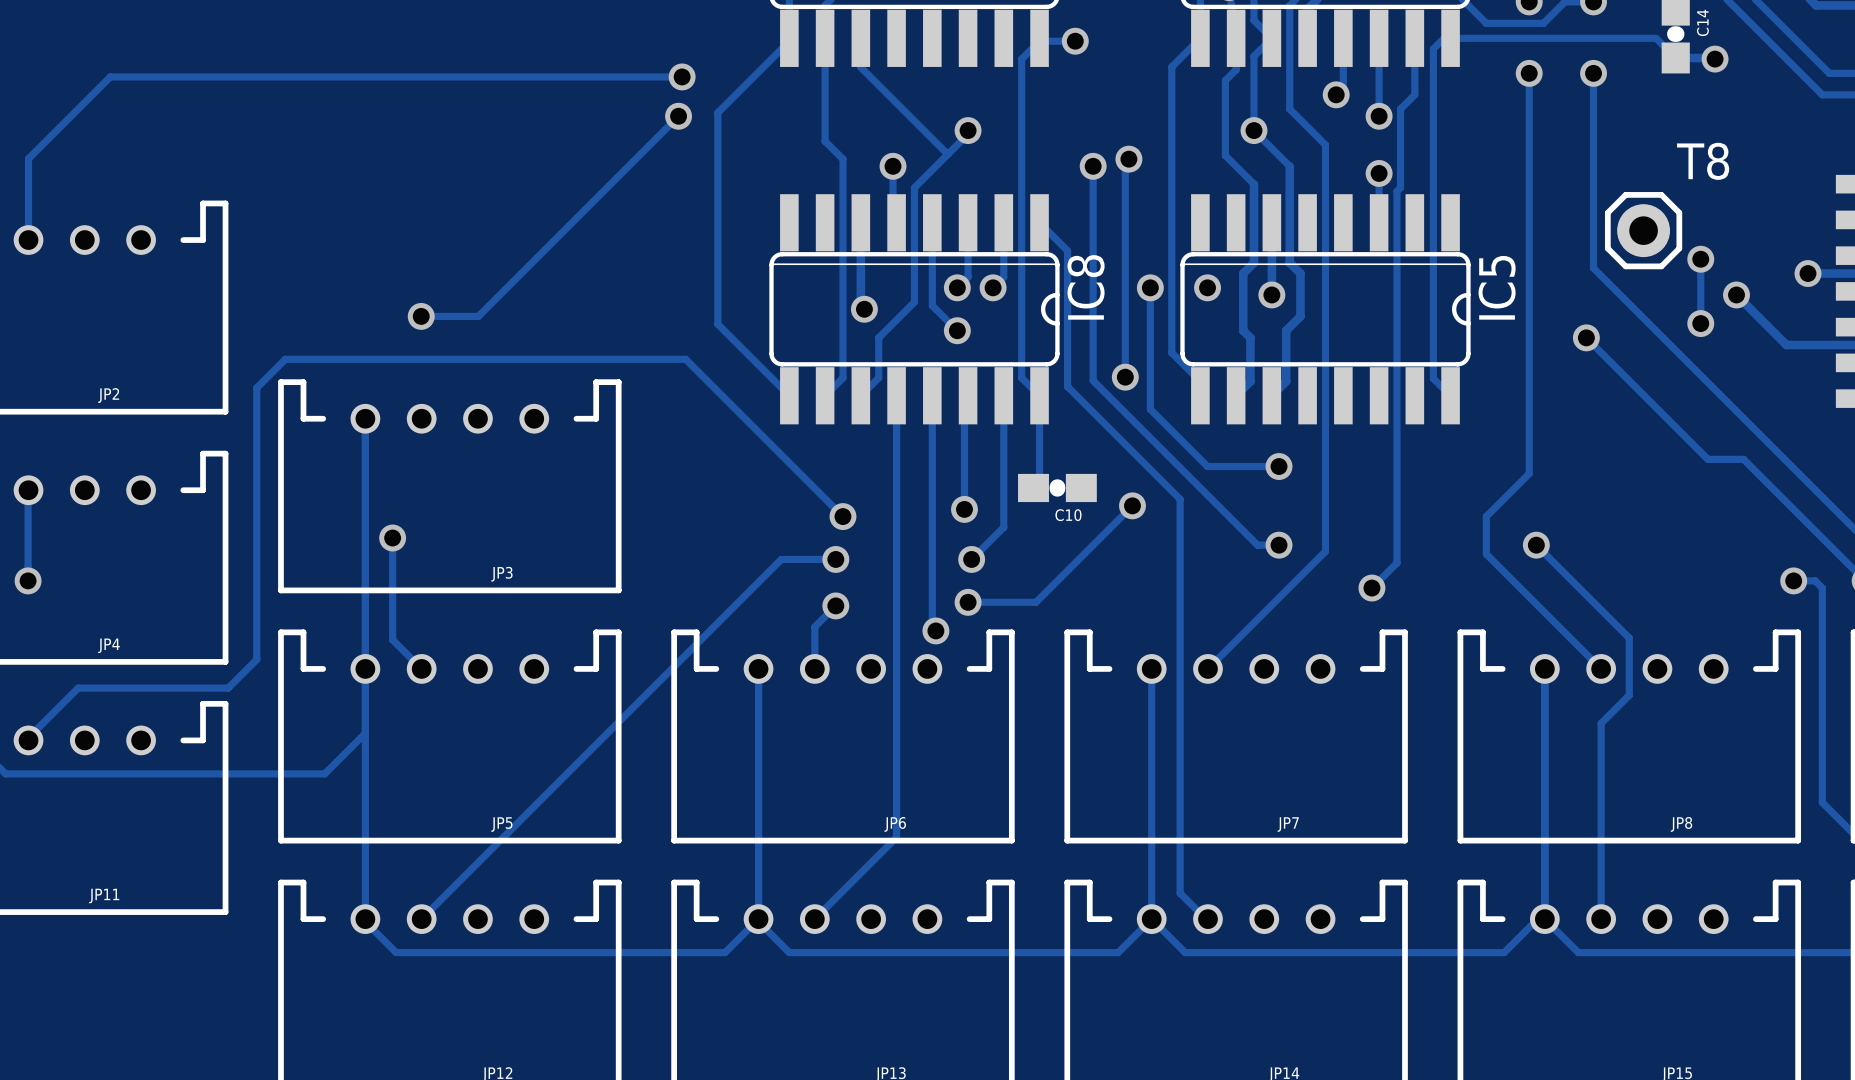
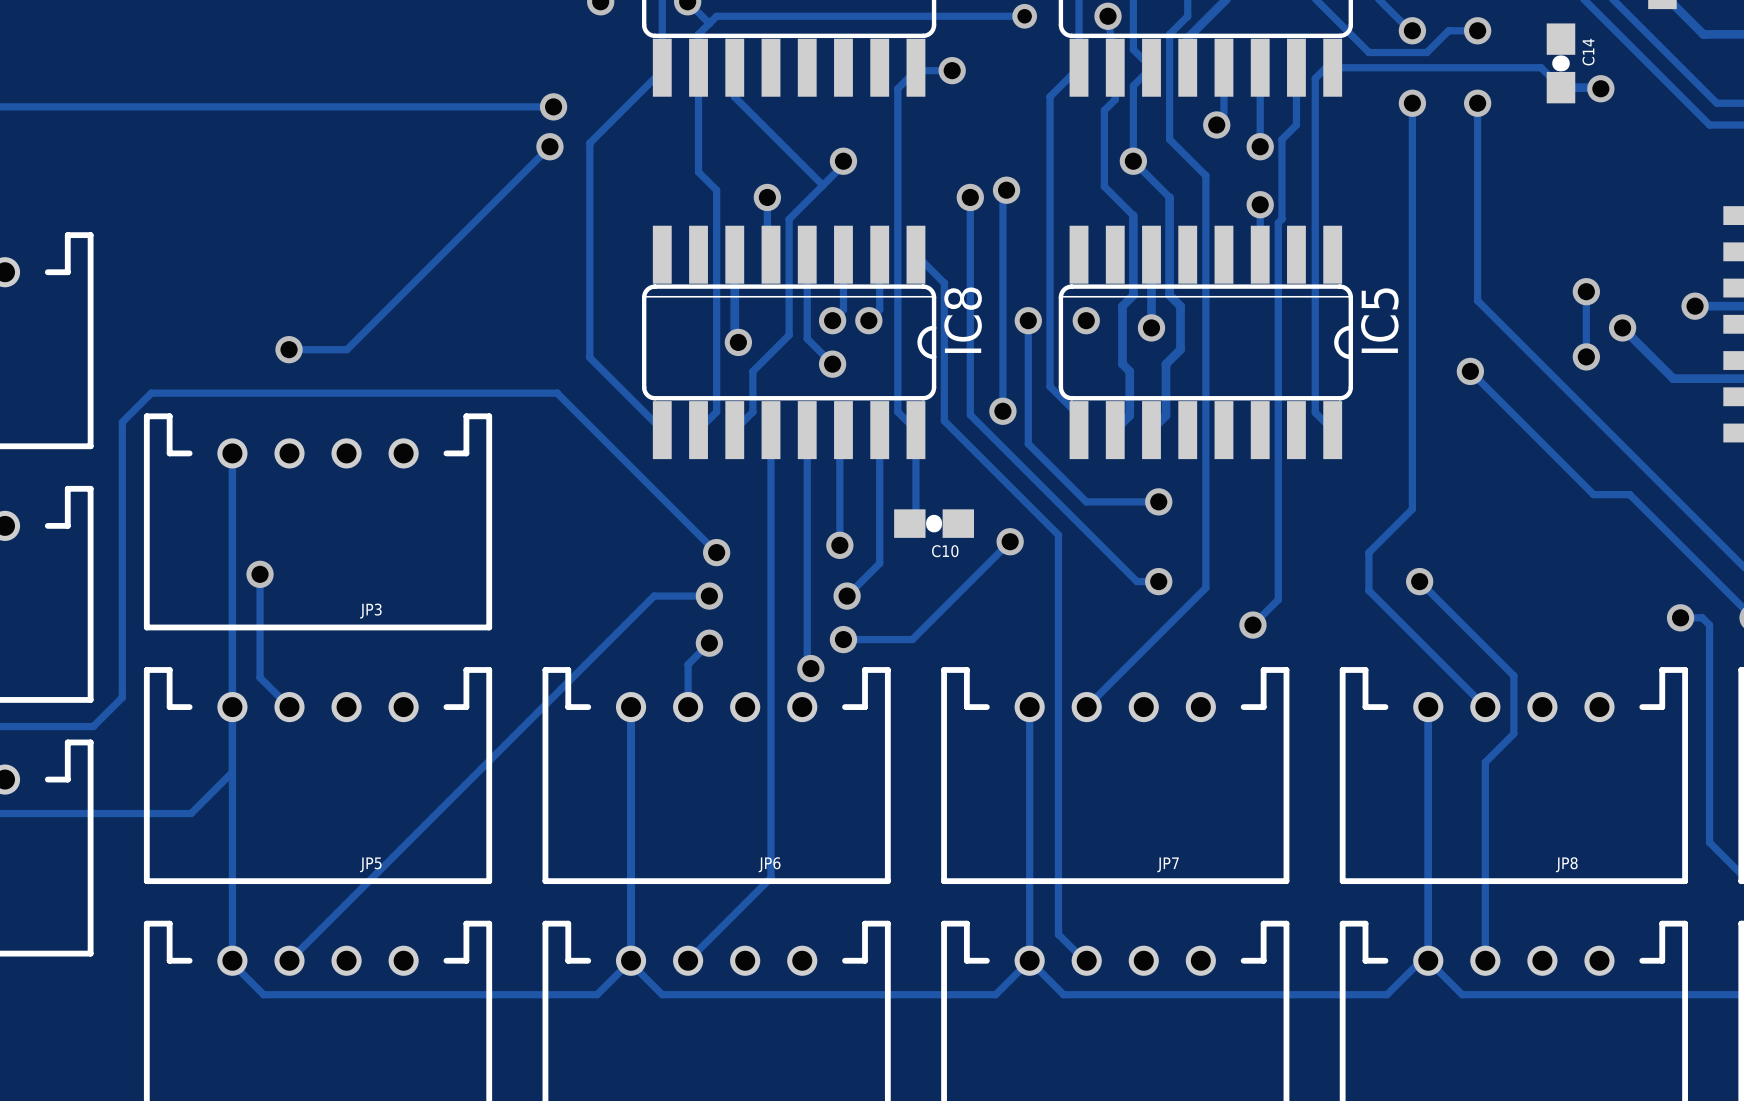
T8: (1643, 230) -> none

